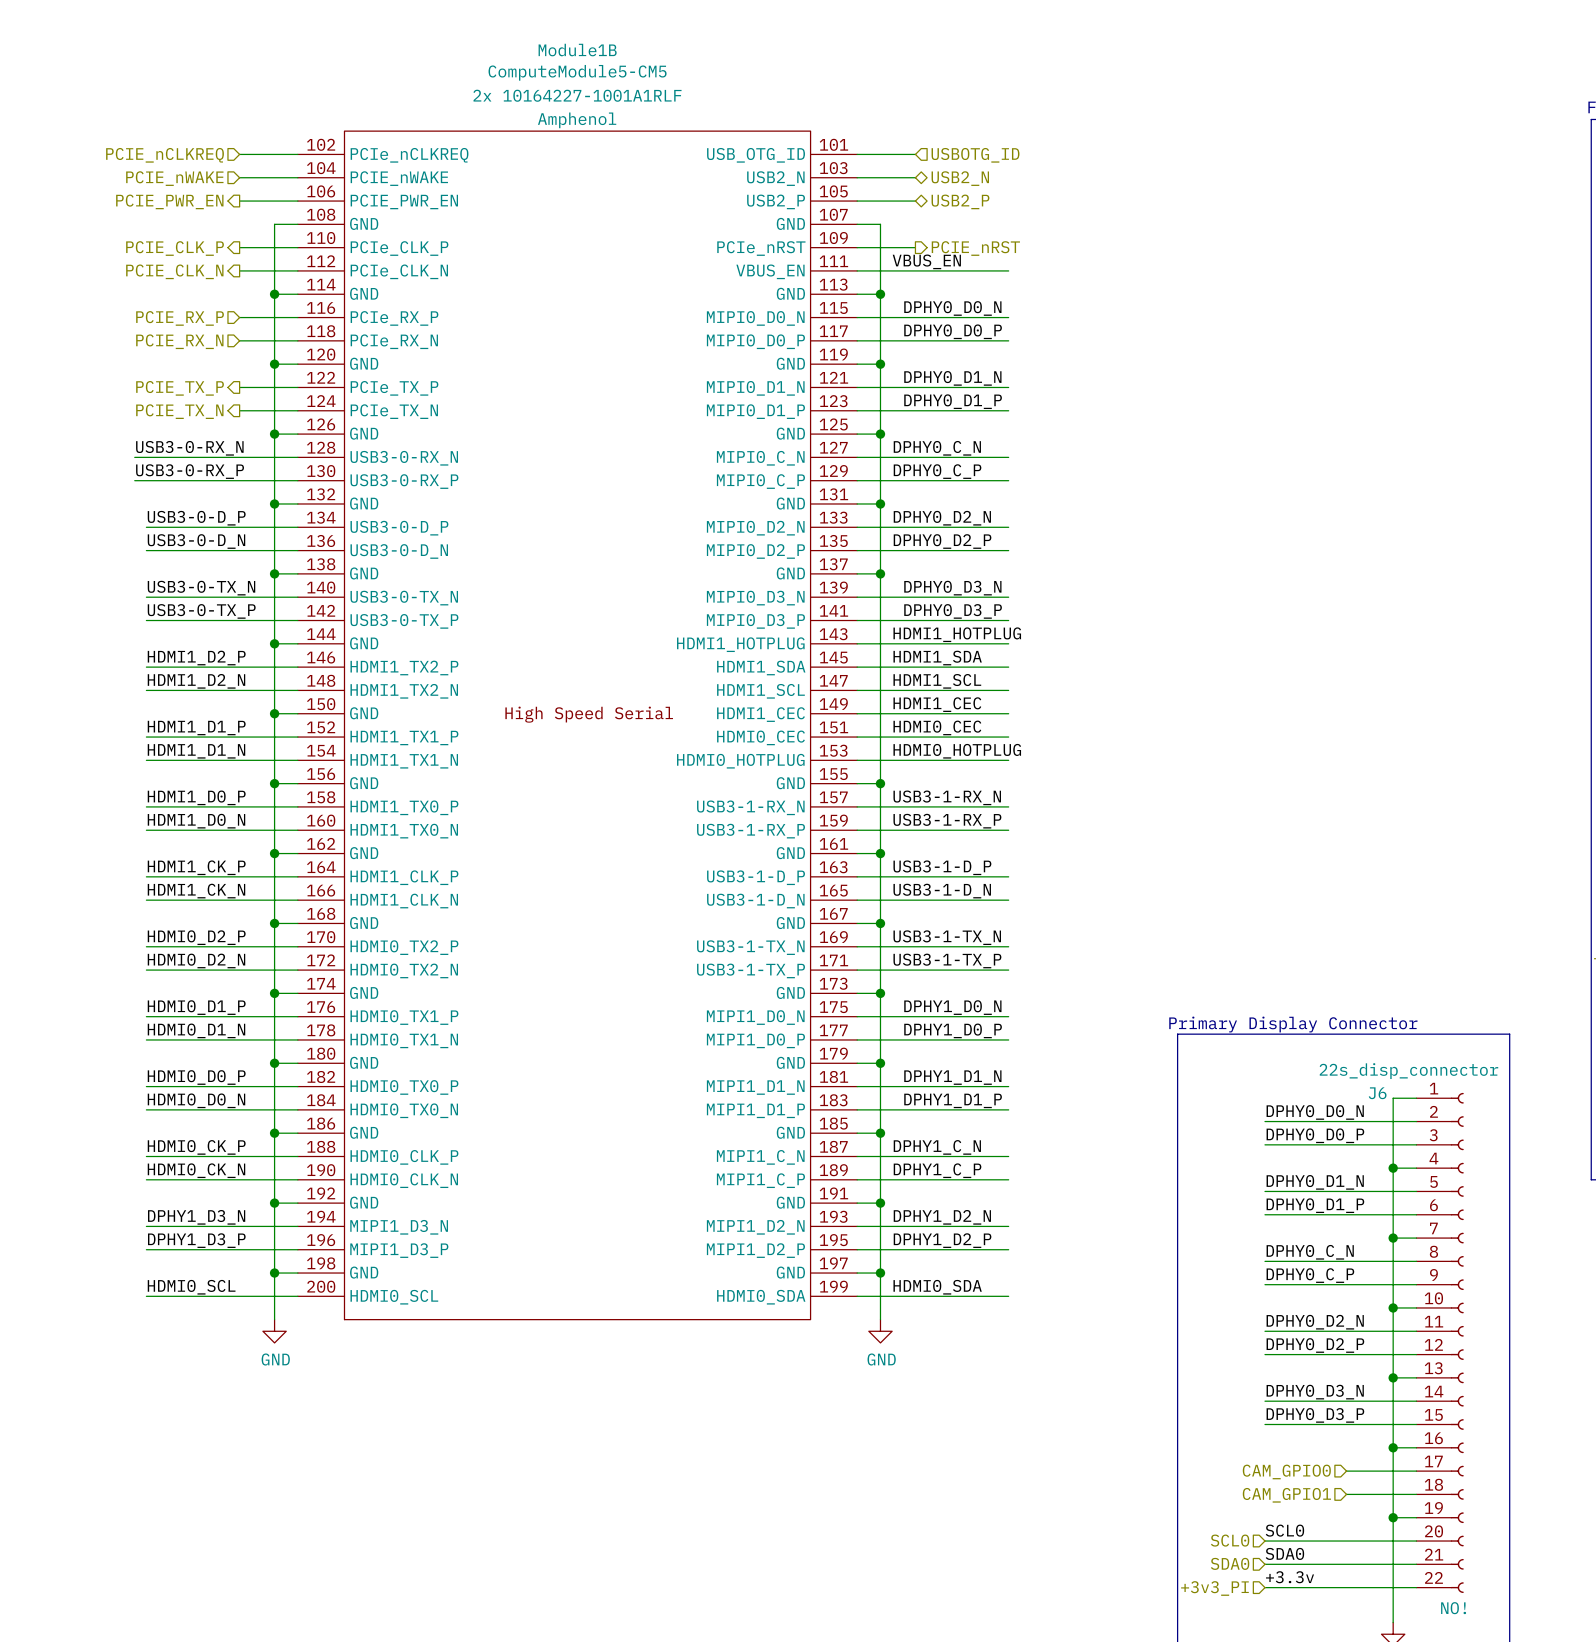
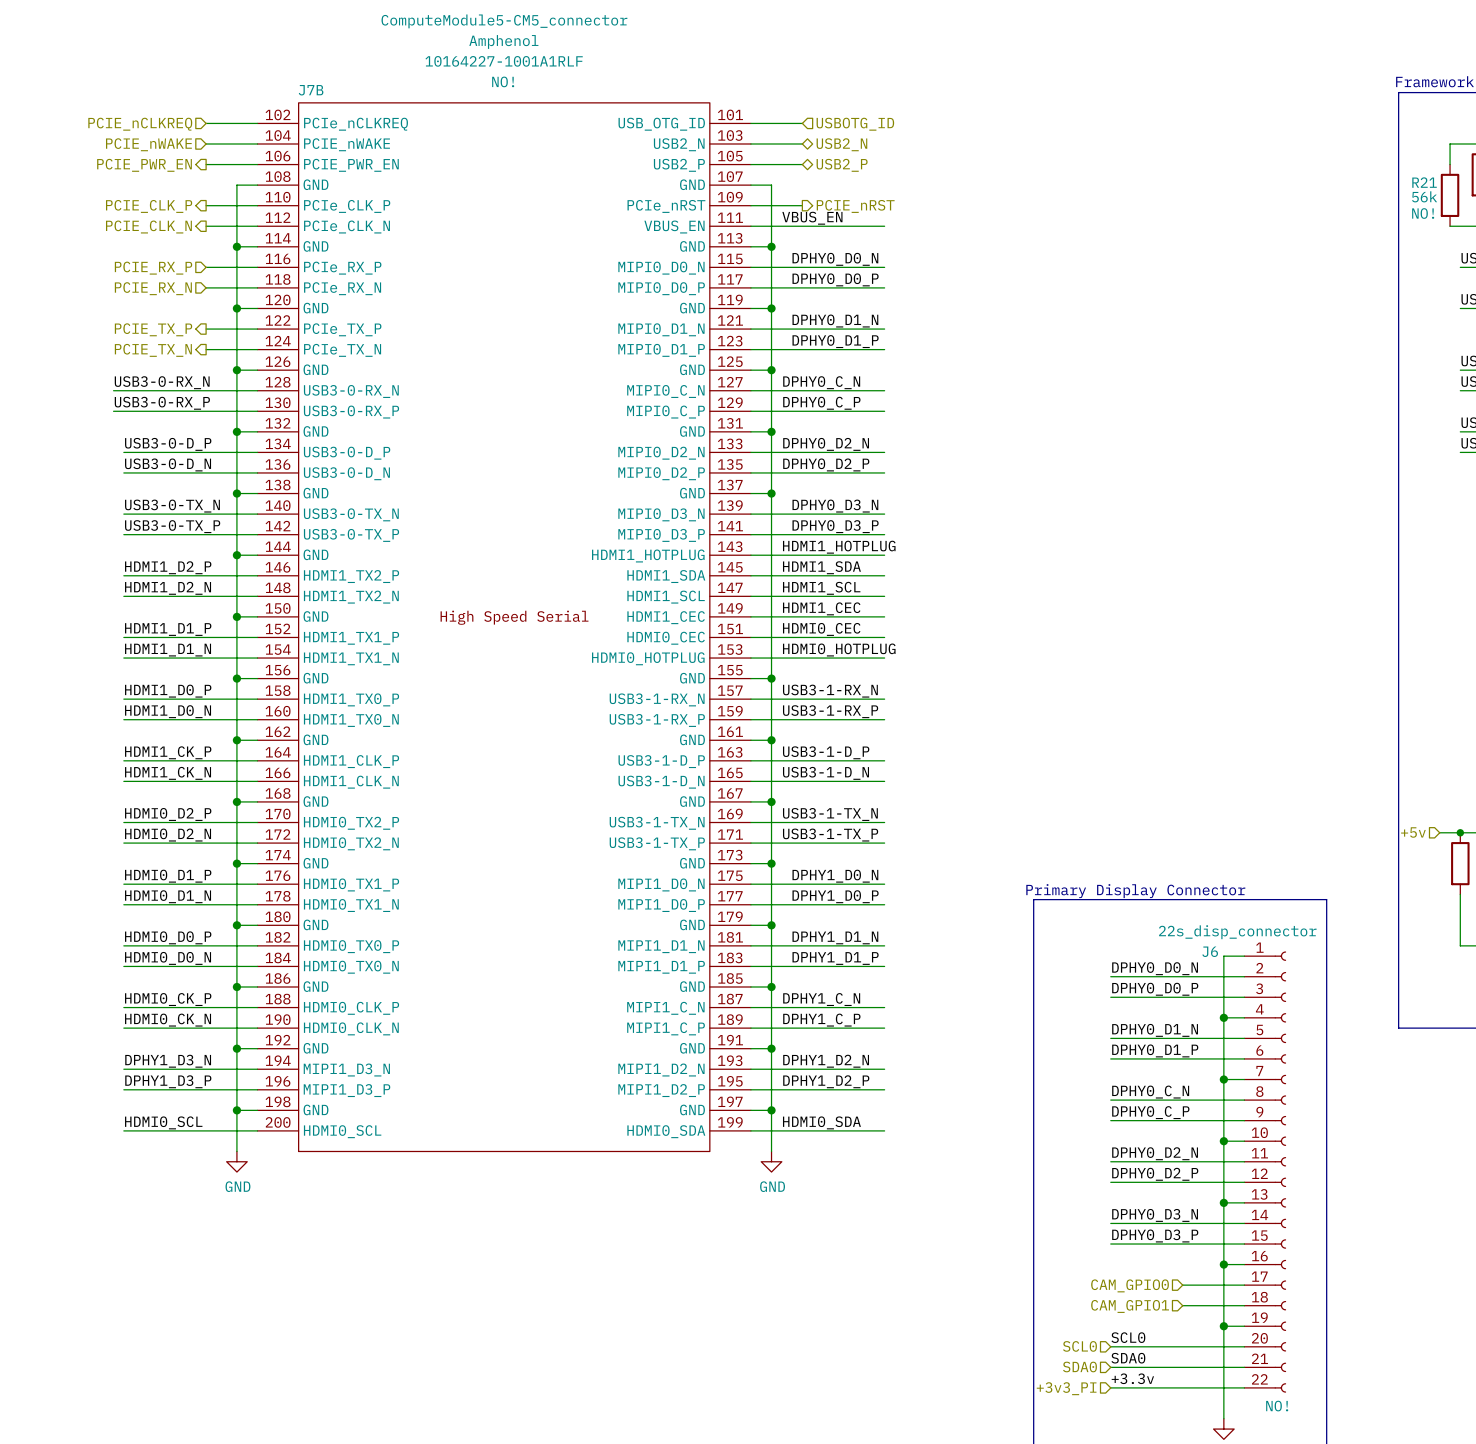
Module1B name: Module1B (577, 50) -> J7B (311, 90)
Module1B text: none -> Amphenol (503, 41)
Module1B value: ComputeModule5-CM5 (577, 72) -> ComputeModule5-CM5_connector (504, 21)
Module1B text: none -> 10164227-1001A1RLF (504, 61)
Module1B text: 2x 10164227-1001A1RLF (577, 95) -> none
Module1B text: none -> NO! (503, 81)
Module1B text: Amphenol (577, 120) -> none

